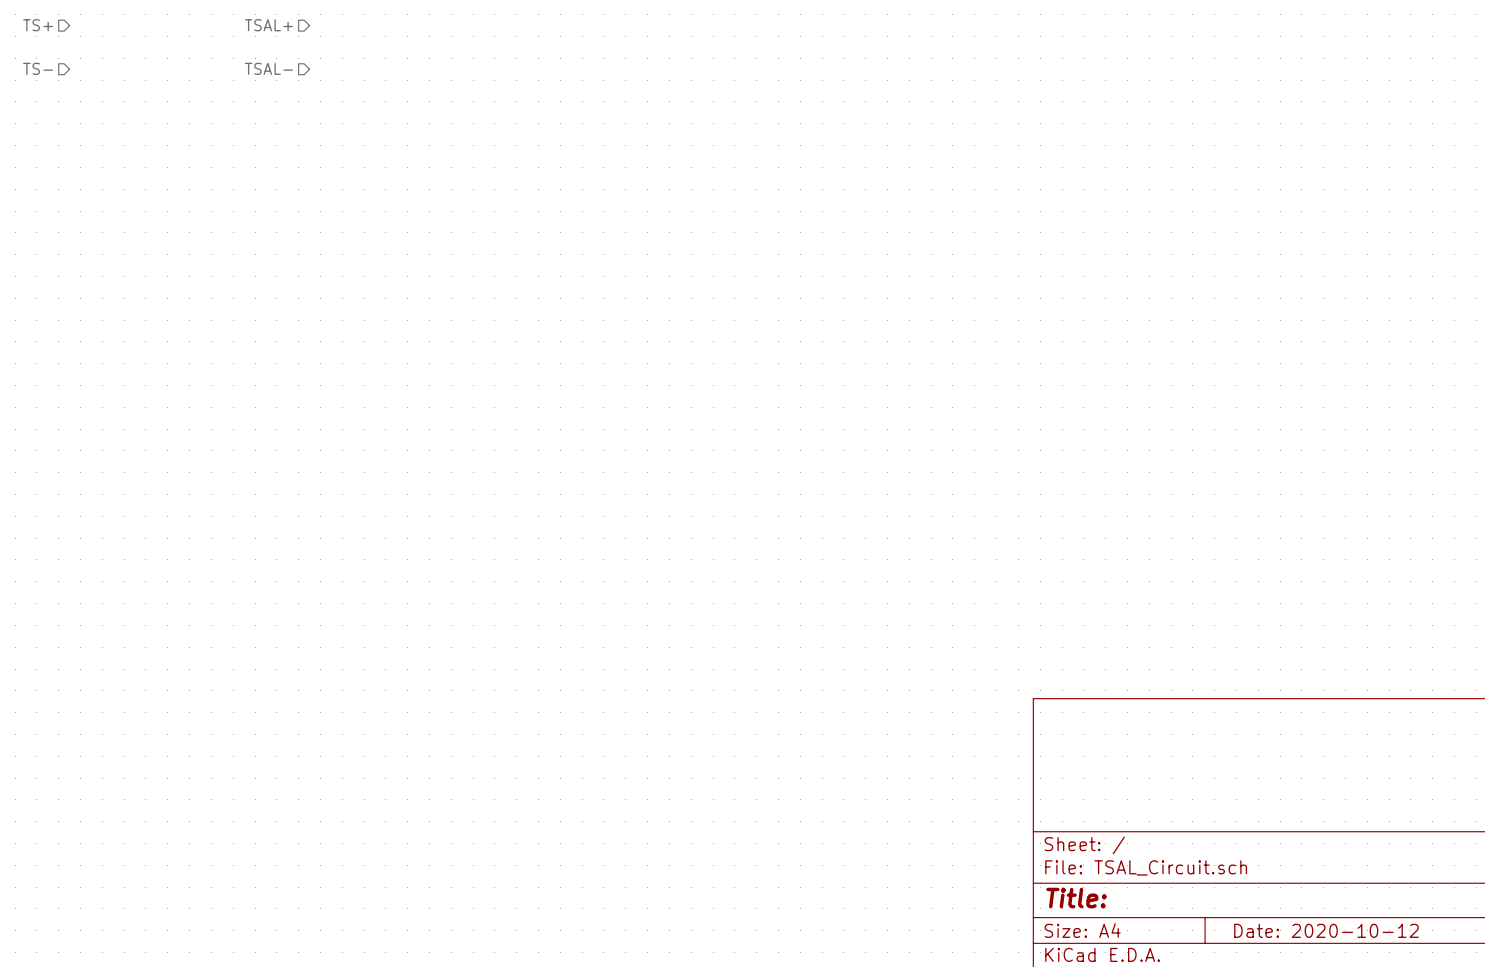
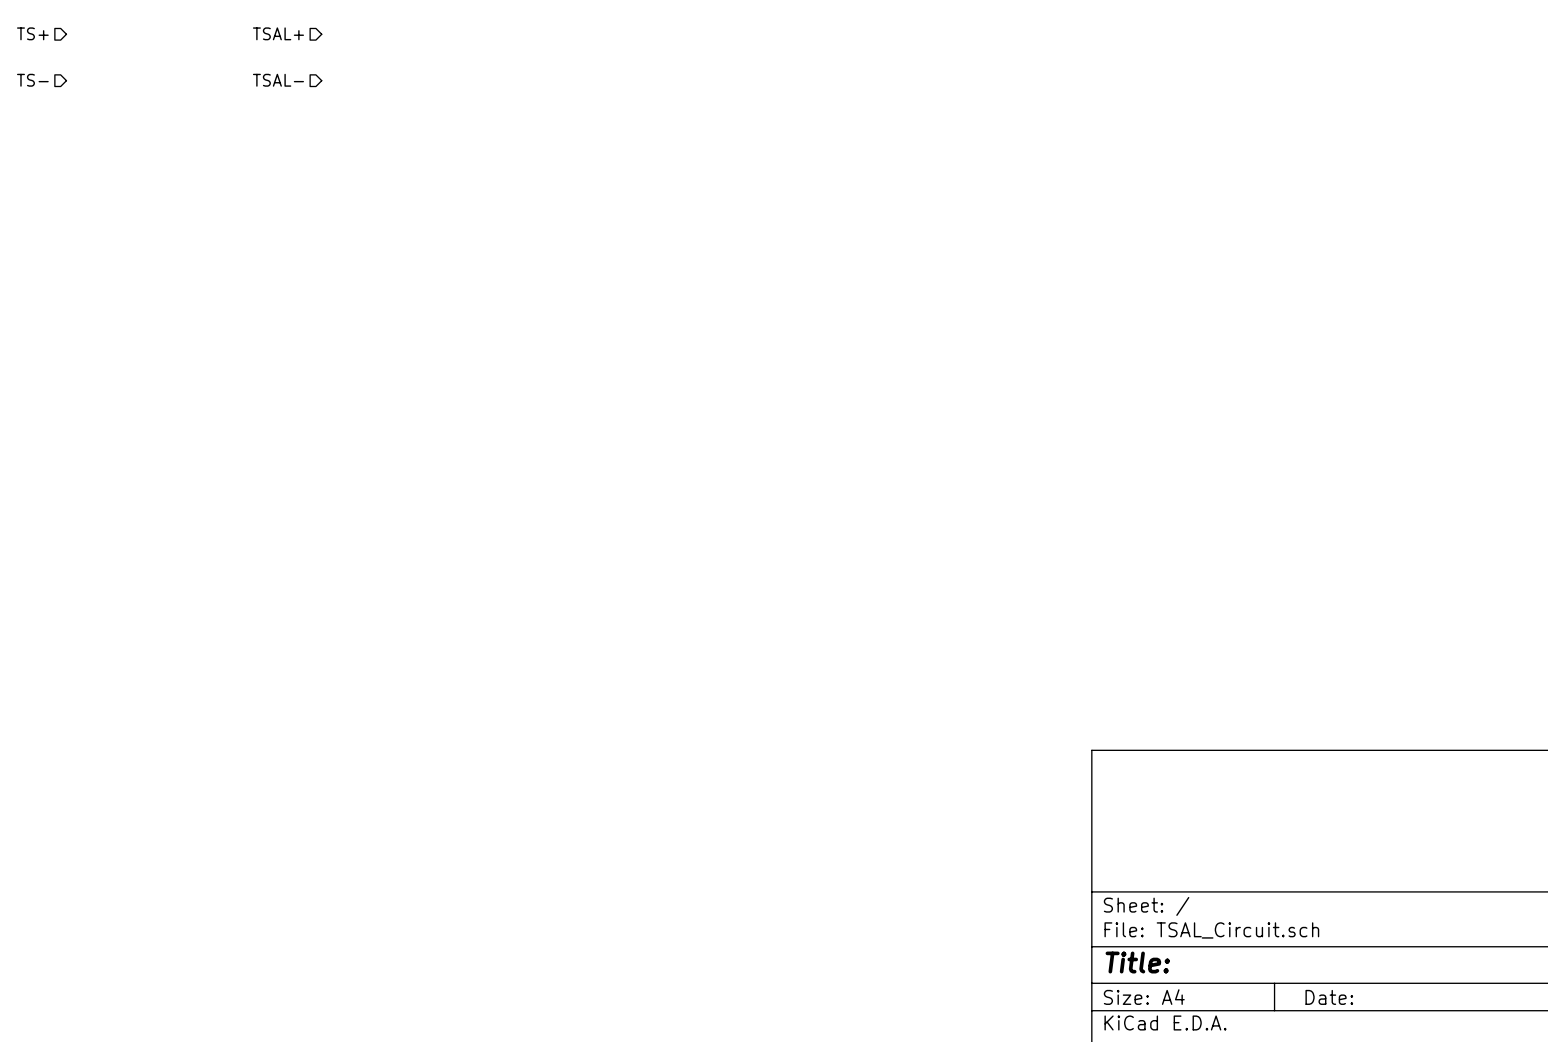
title block: Date: 2020-10-12 (1326, 930) -> Date: (1329, 997)

